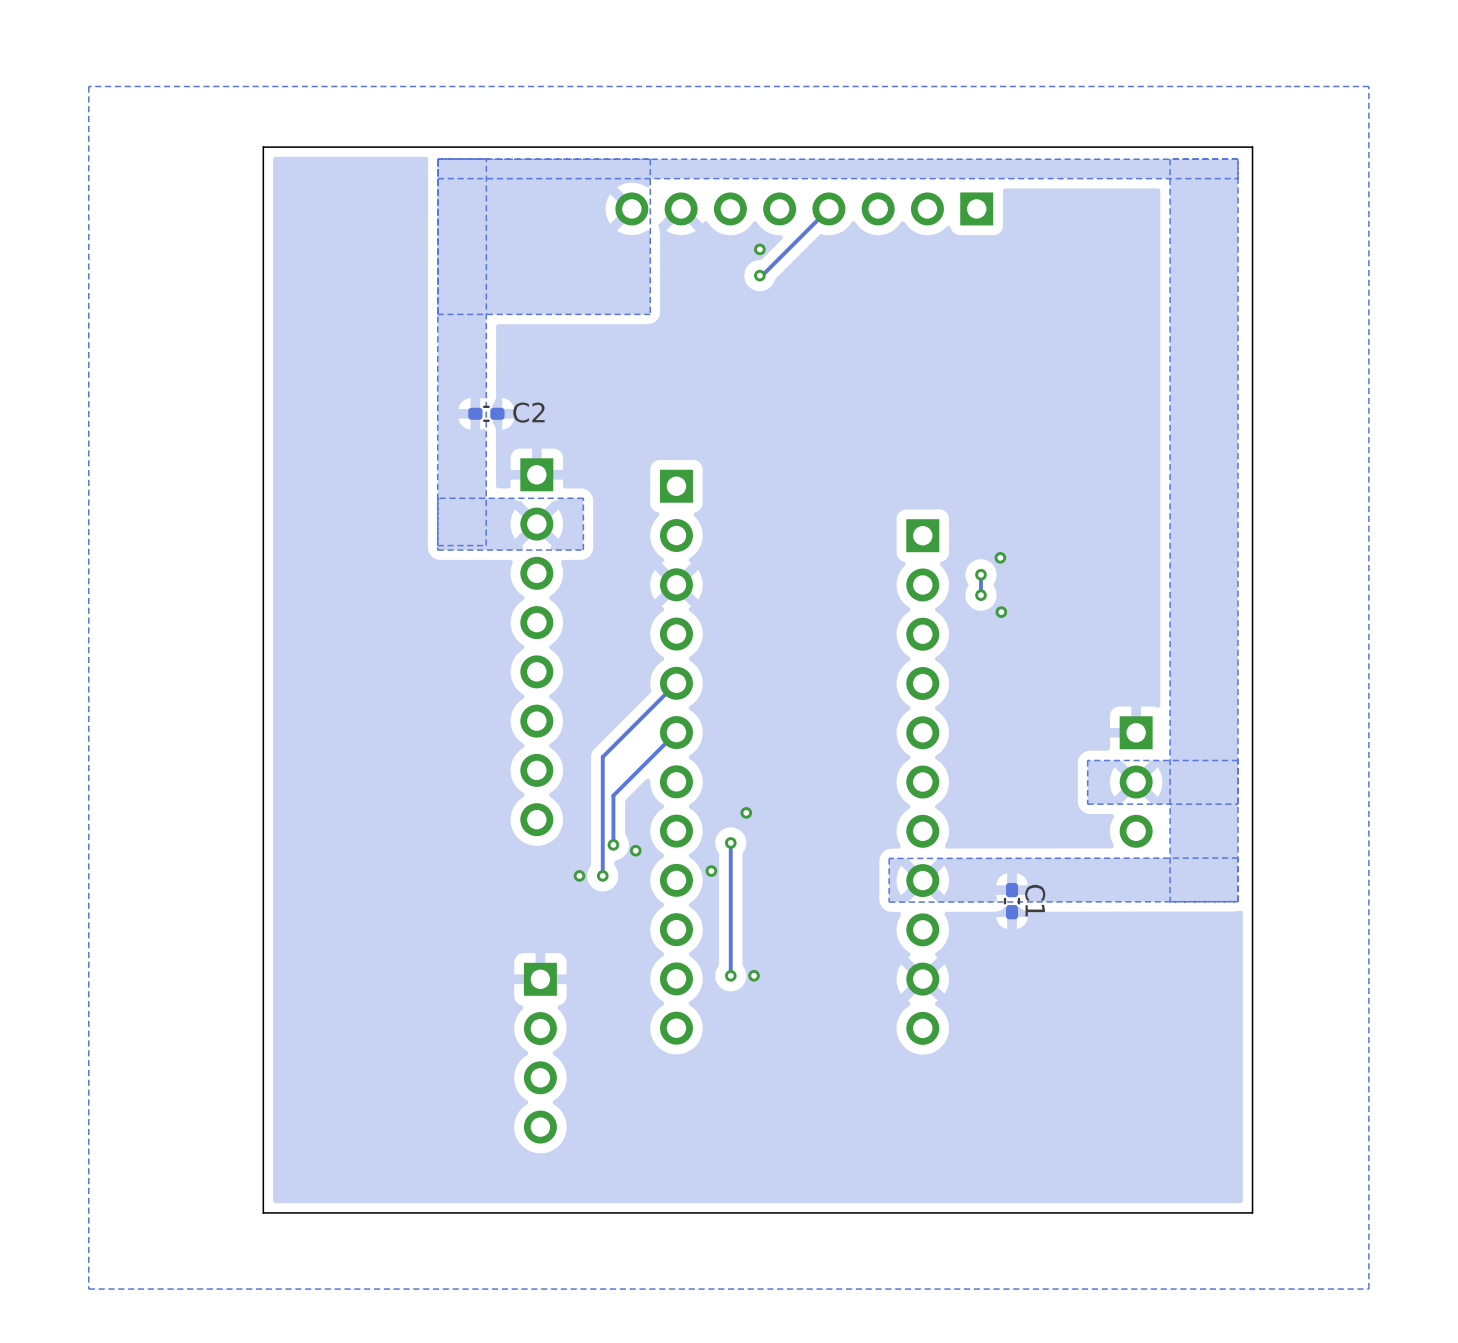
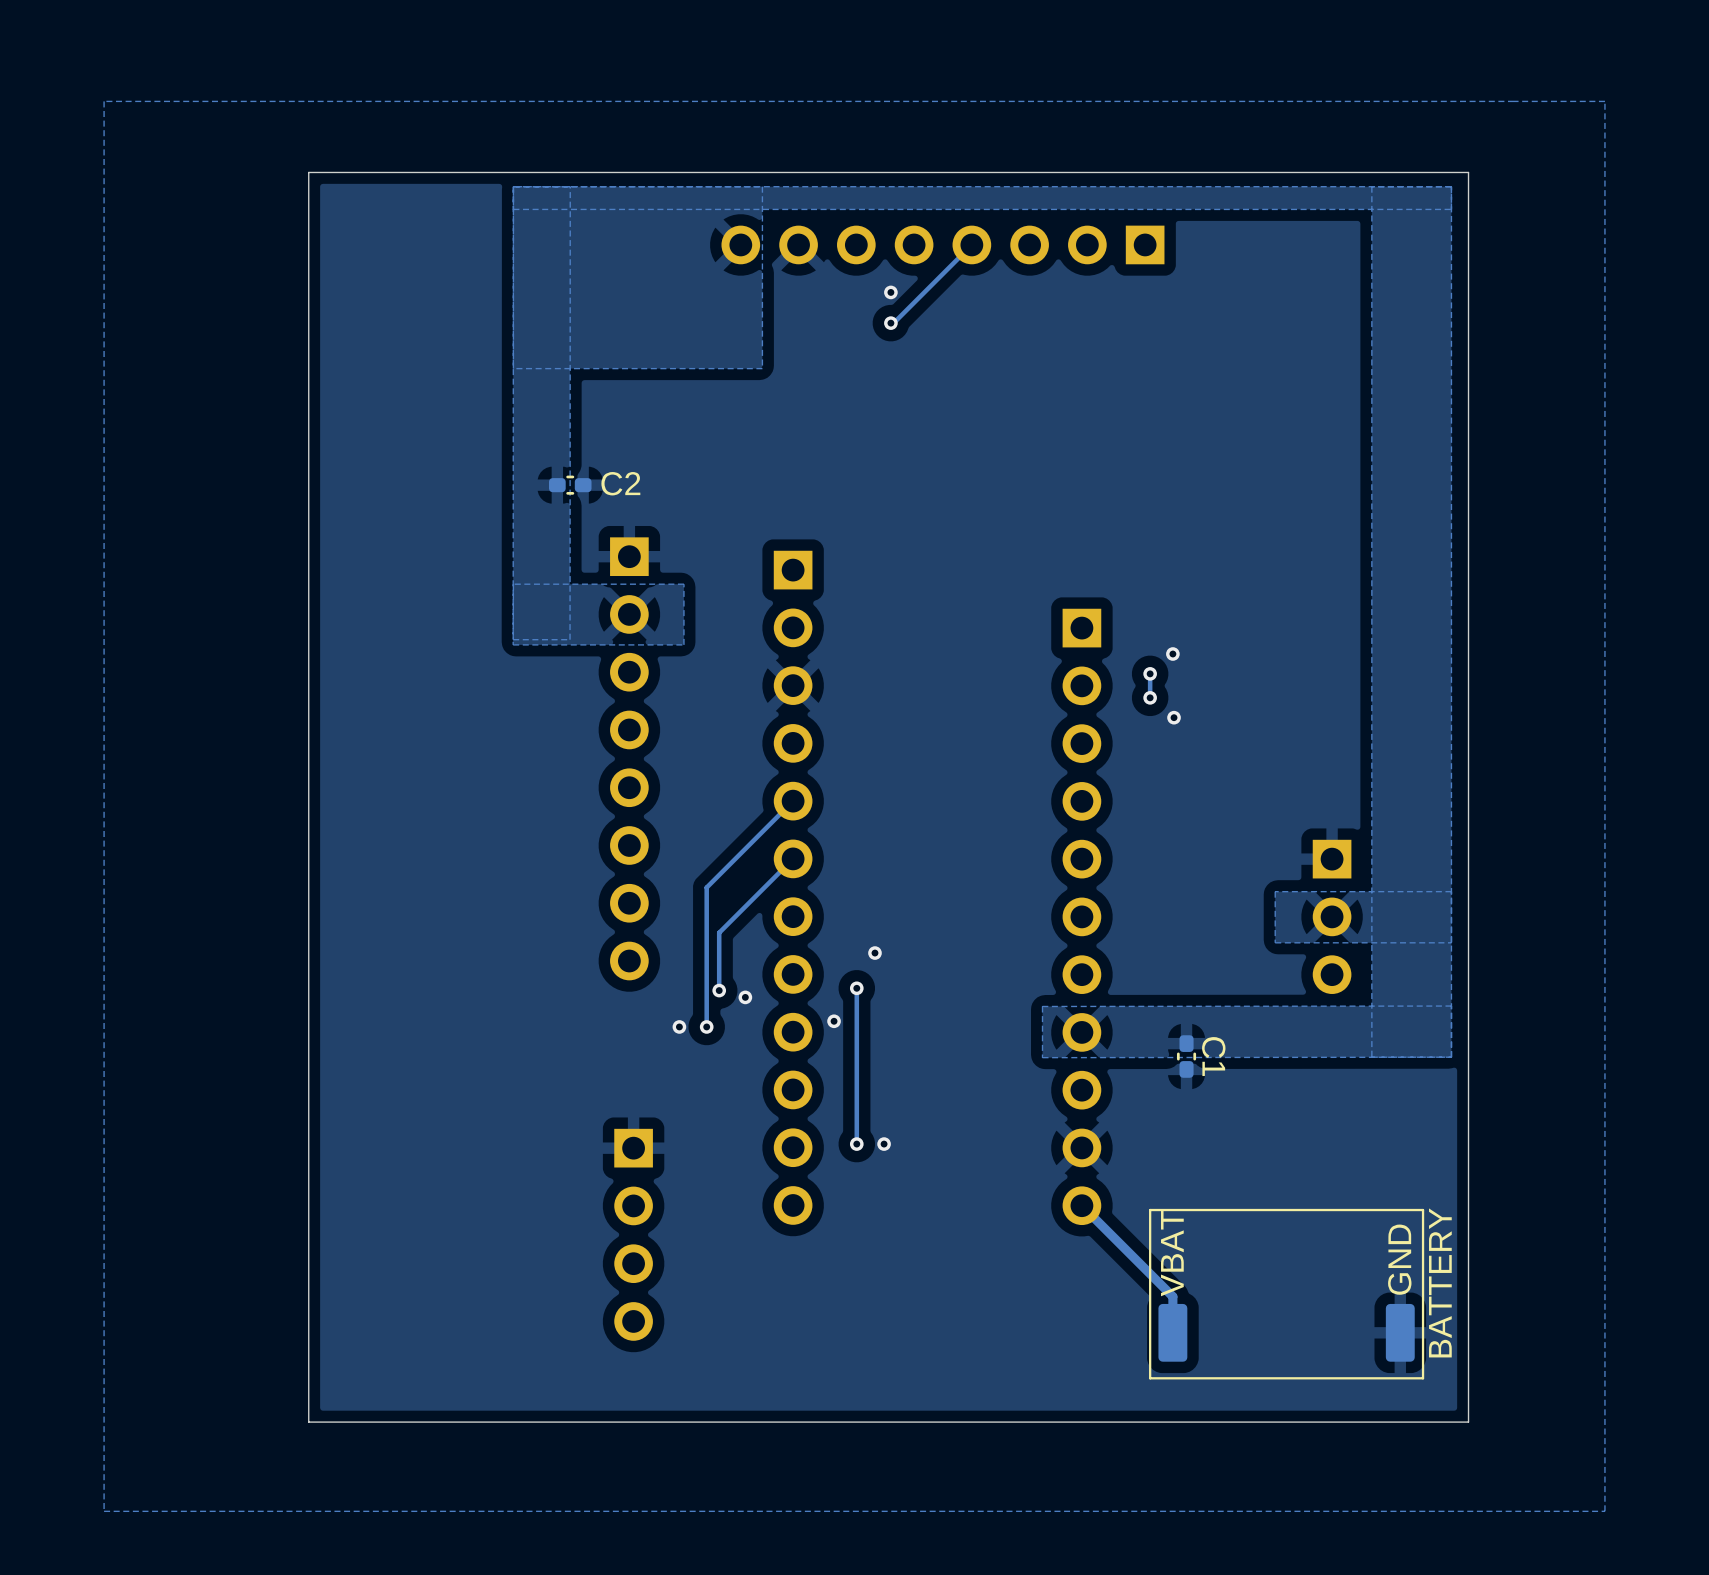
track: none -> (1081, 1205) (1172, 1296) (1172, 1332)
BATTERY: none -> (1286, 1294)

